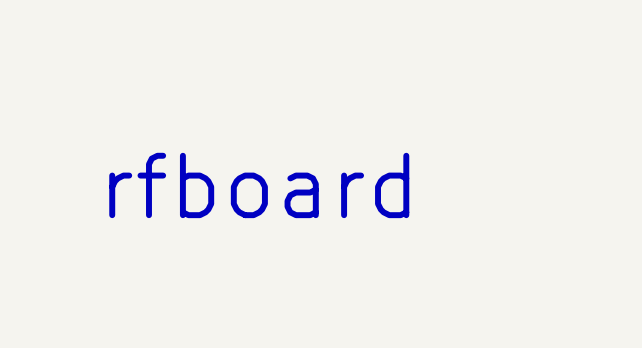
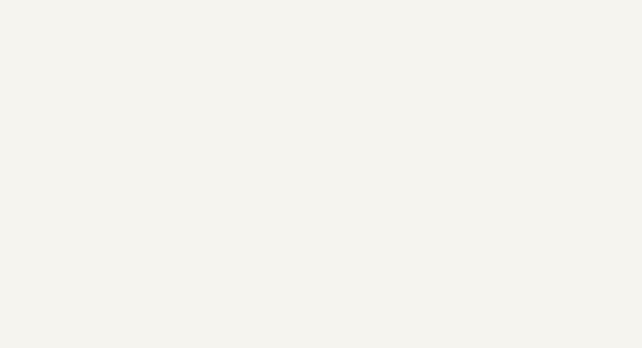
text: rfboard (259, 185) -> none

